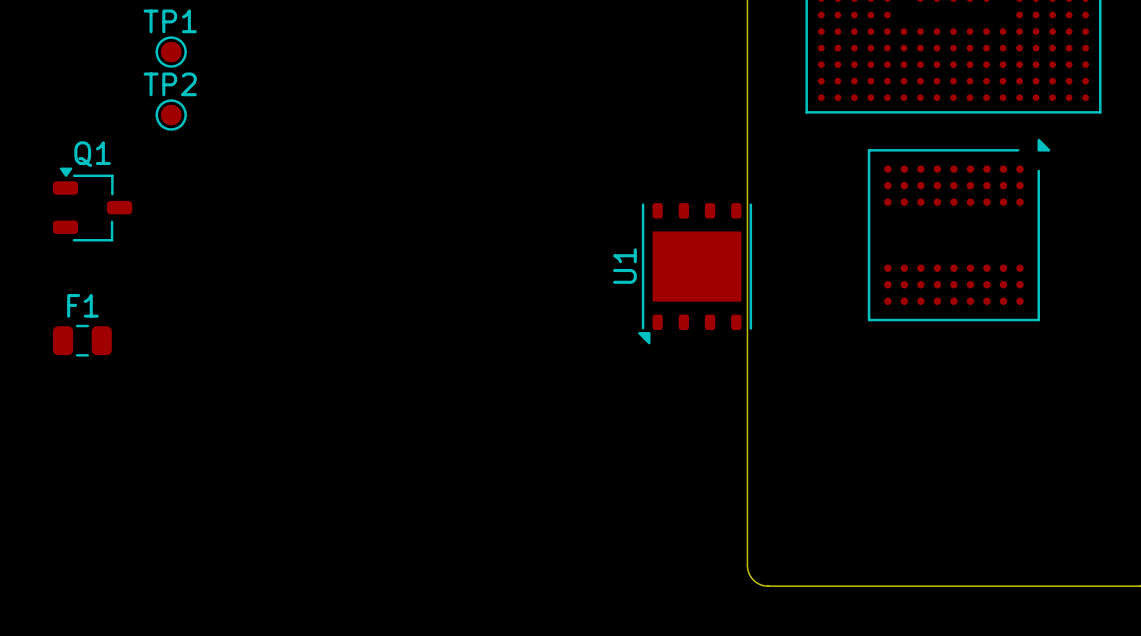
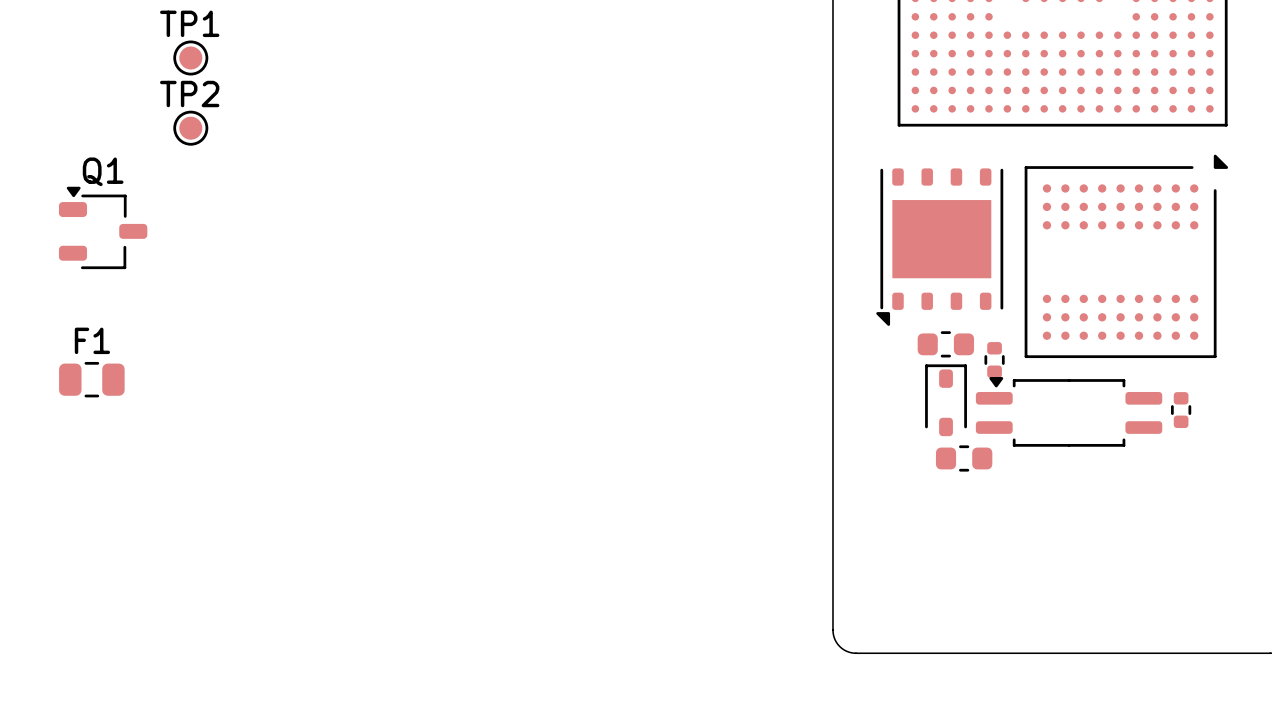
part: none -> (939, 247)
part position: (959, 230) -> (1126, 256)
U1: (695, 273) -> none
part: none -> (945, 344)
part: none -> (994, 360)
part: none -> (946, 400)
part: none -> (1181, 410)
part: none -> (1069, 411)
part: none -> (964, 458)

